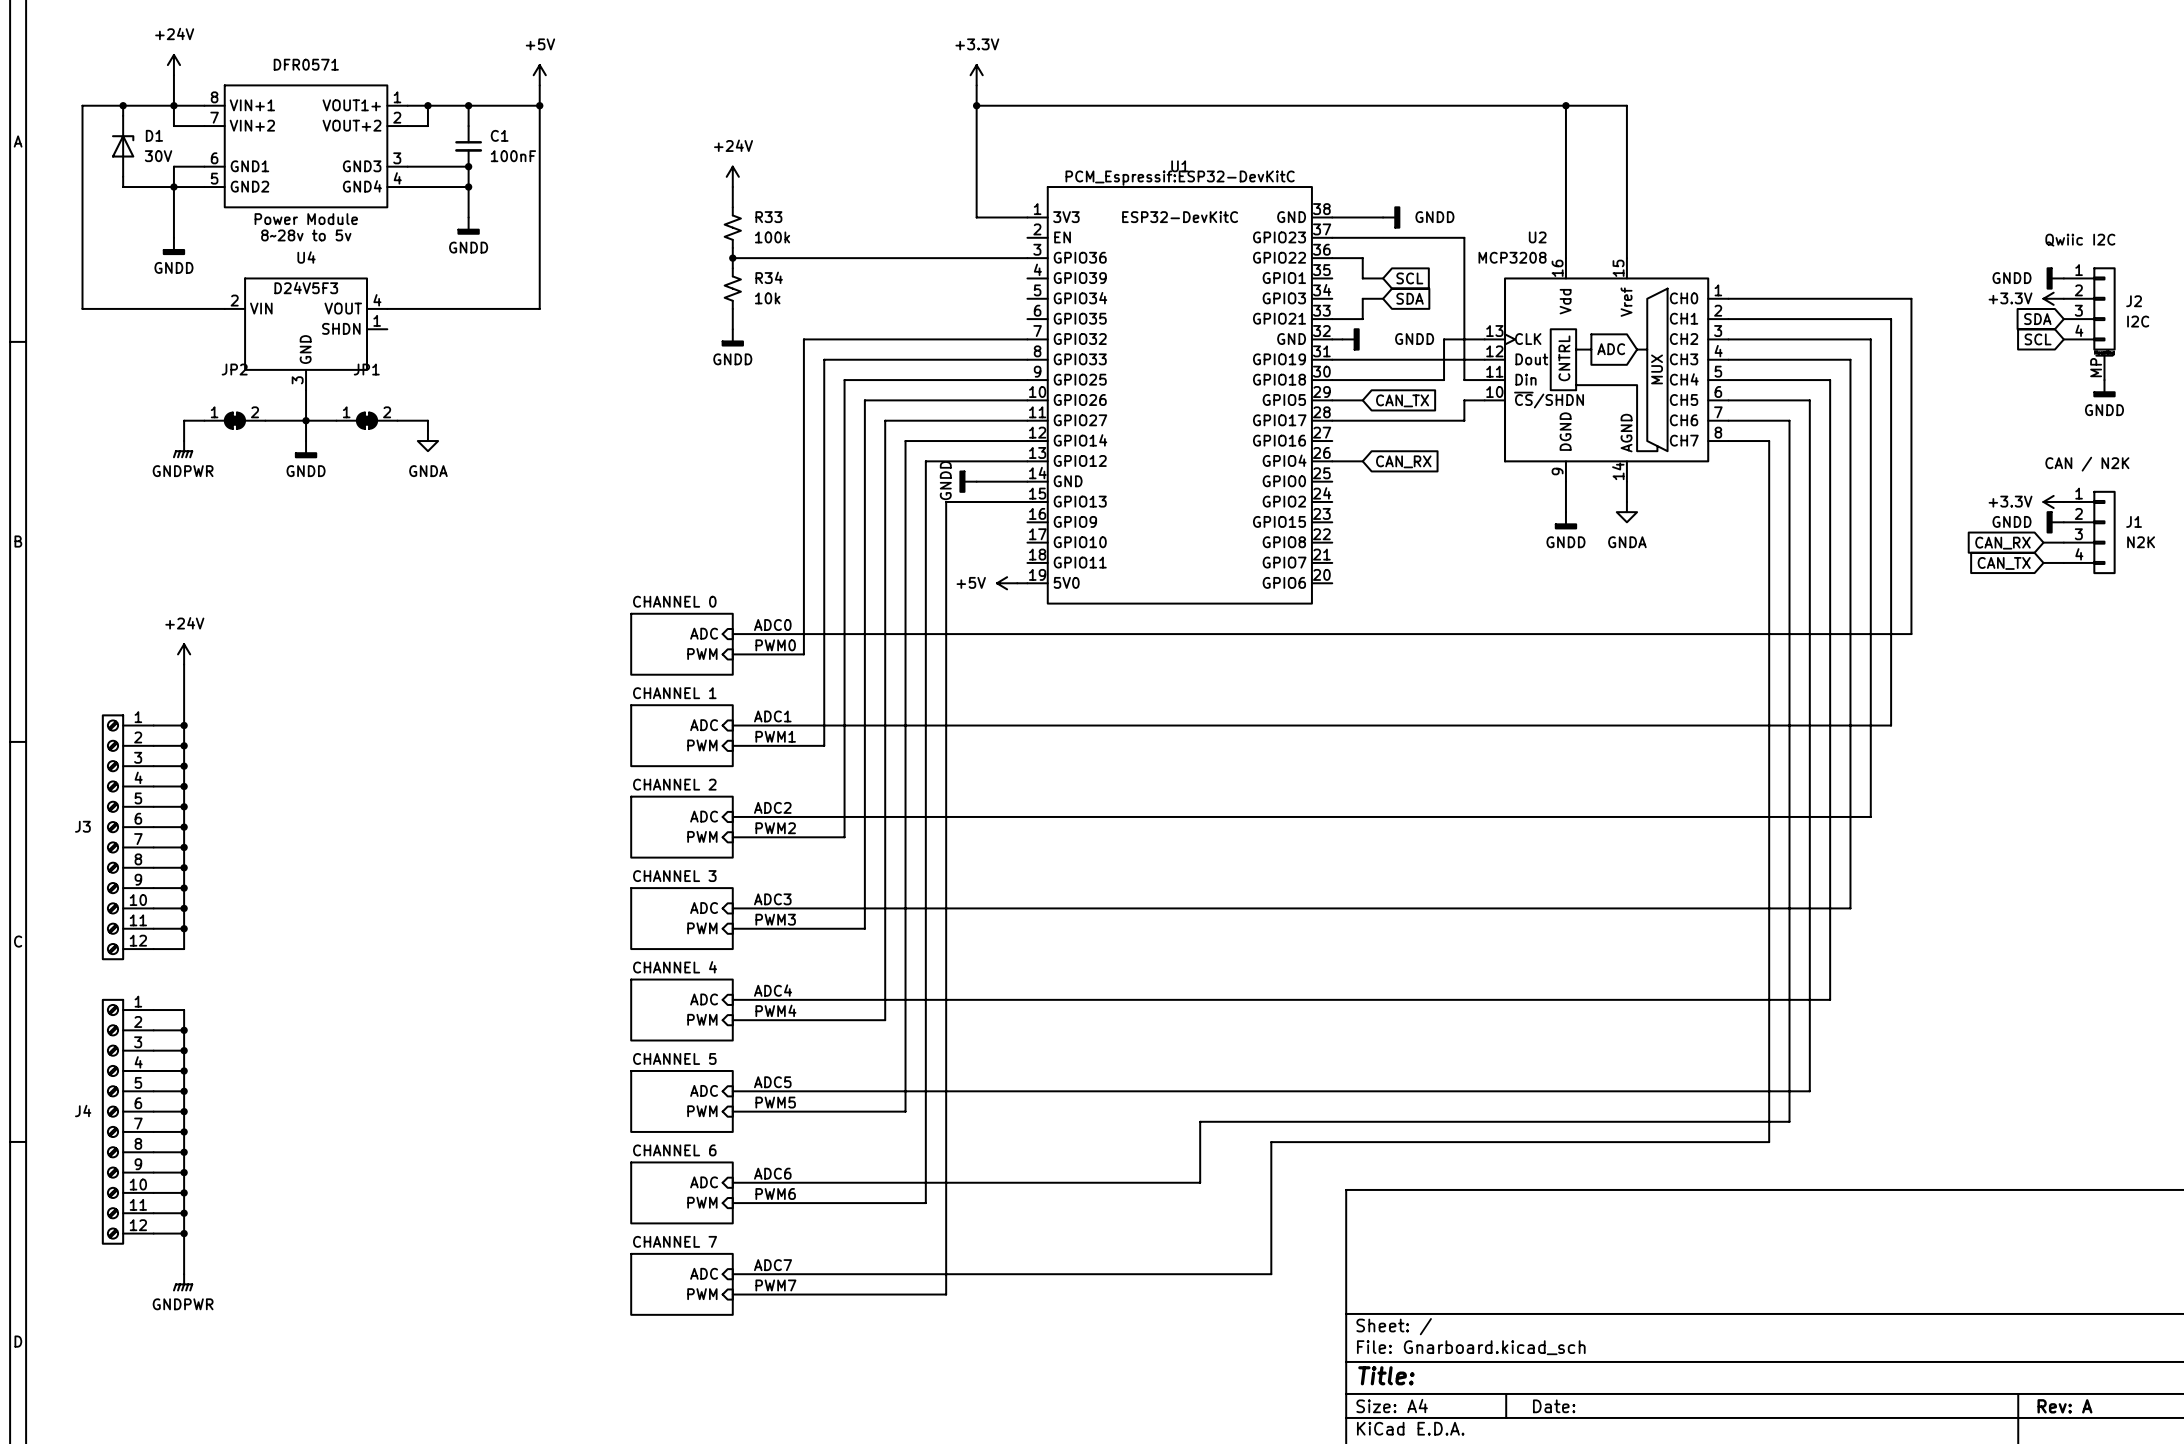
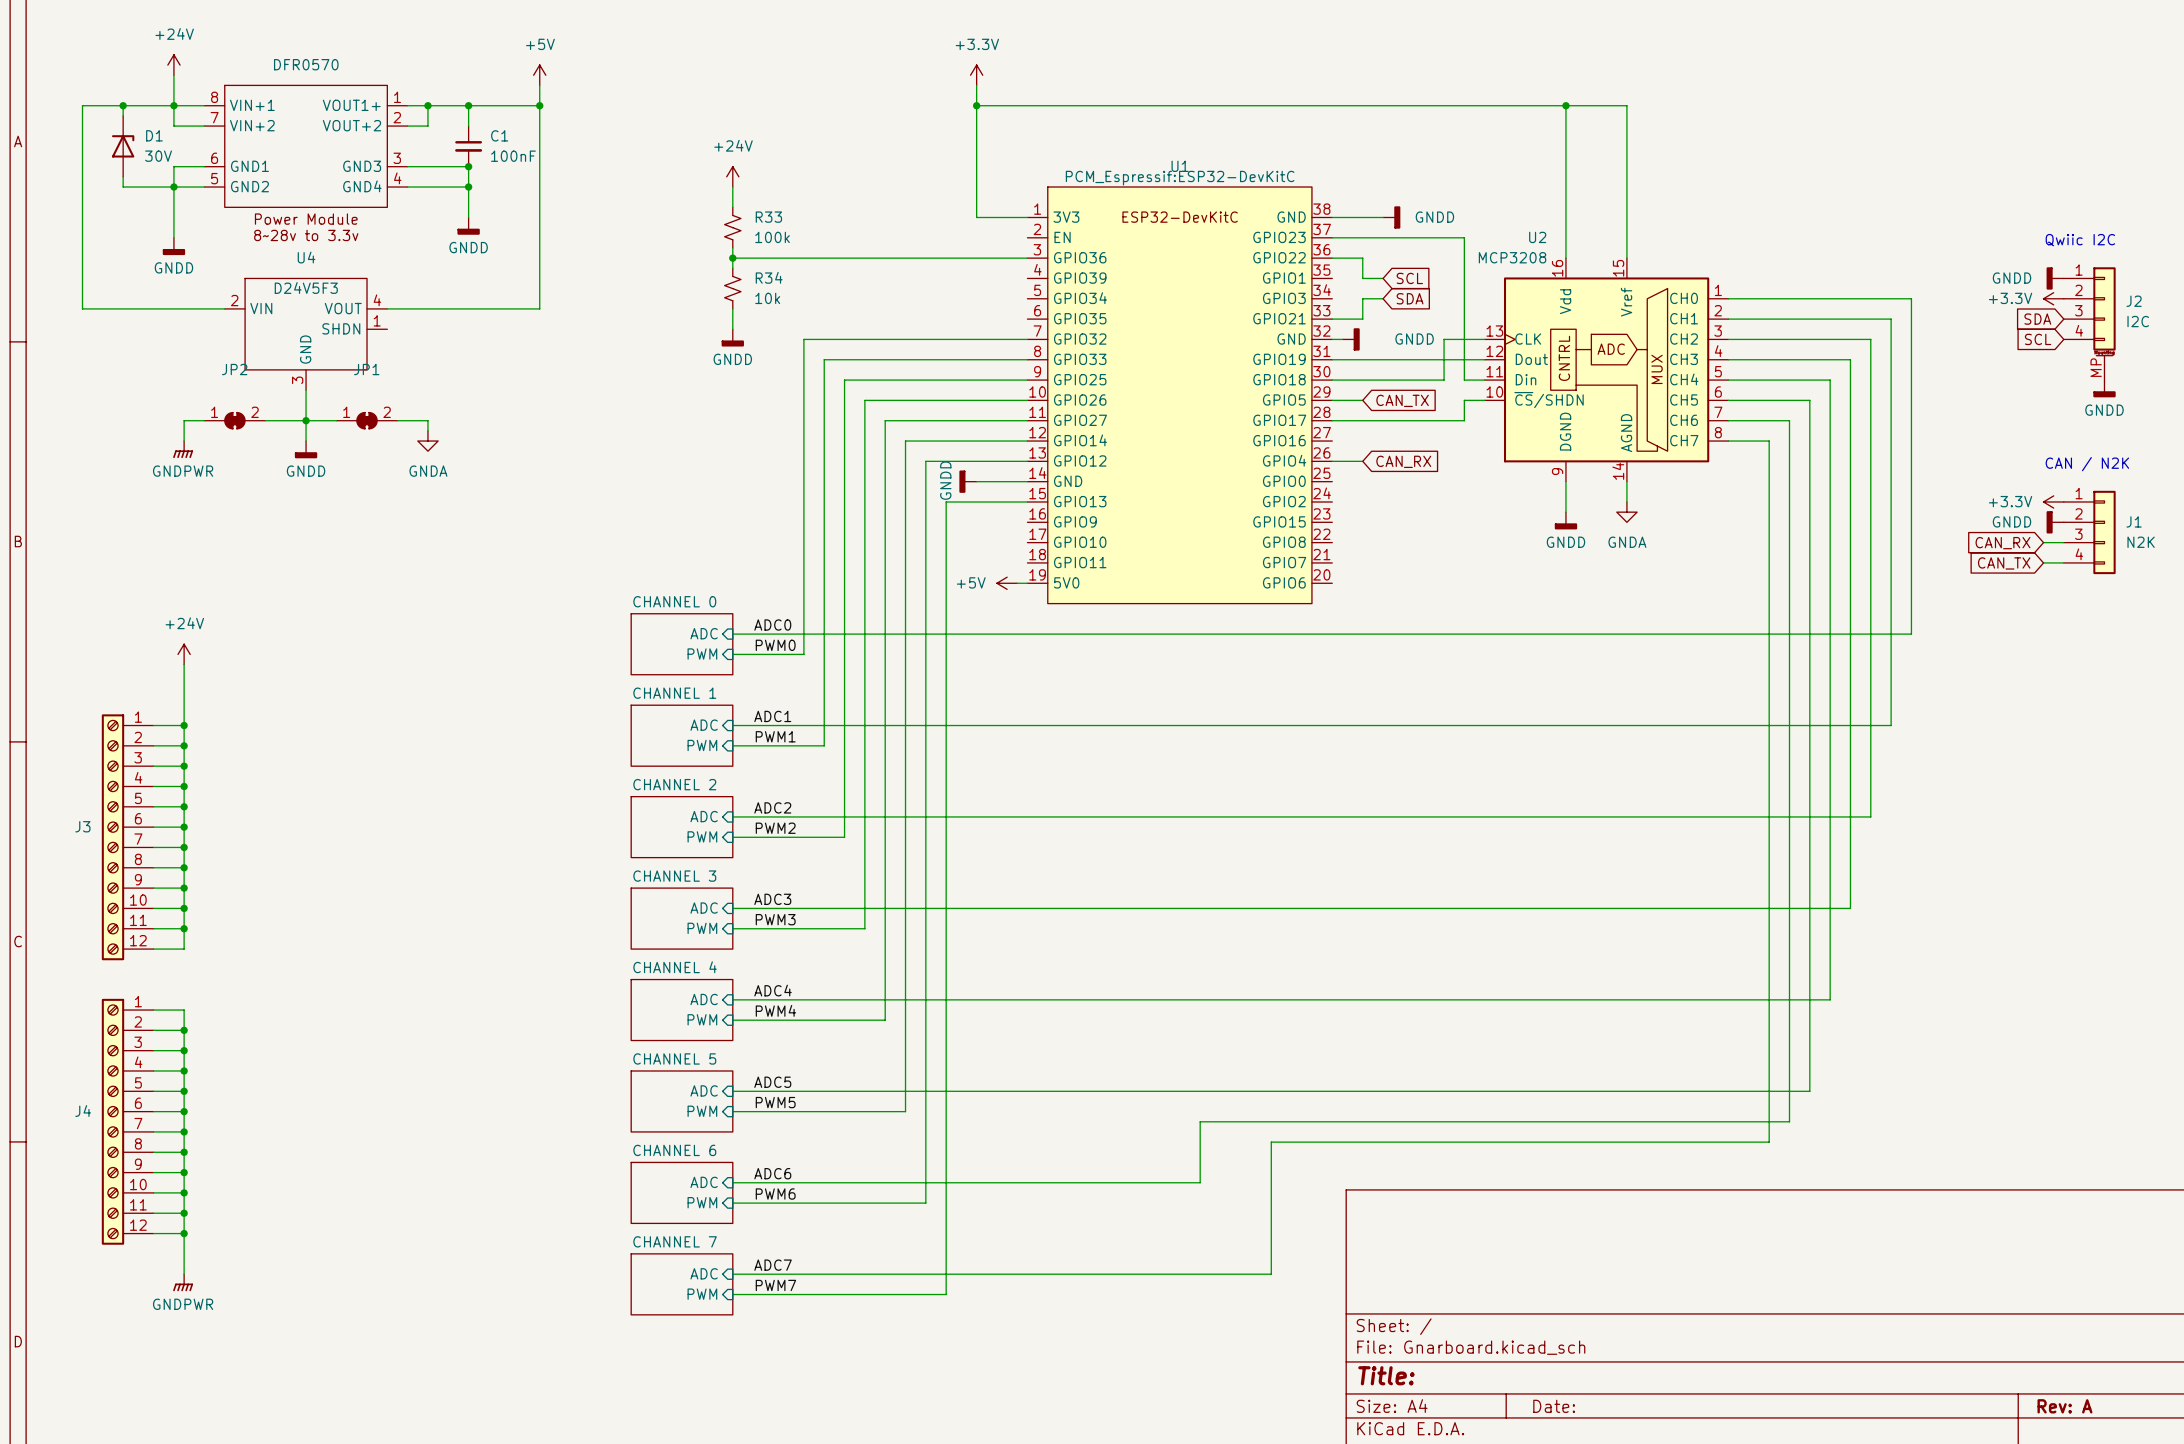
DFR0571 name: DFR0571 (306, 64) -> DFR0570 (306, 64)
DFR0571 text: 8~28v to 5v (306, 235) -> 8~28v to 3.3v (306, 235)

